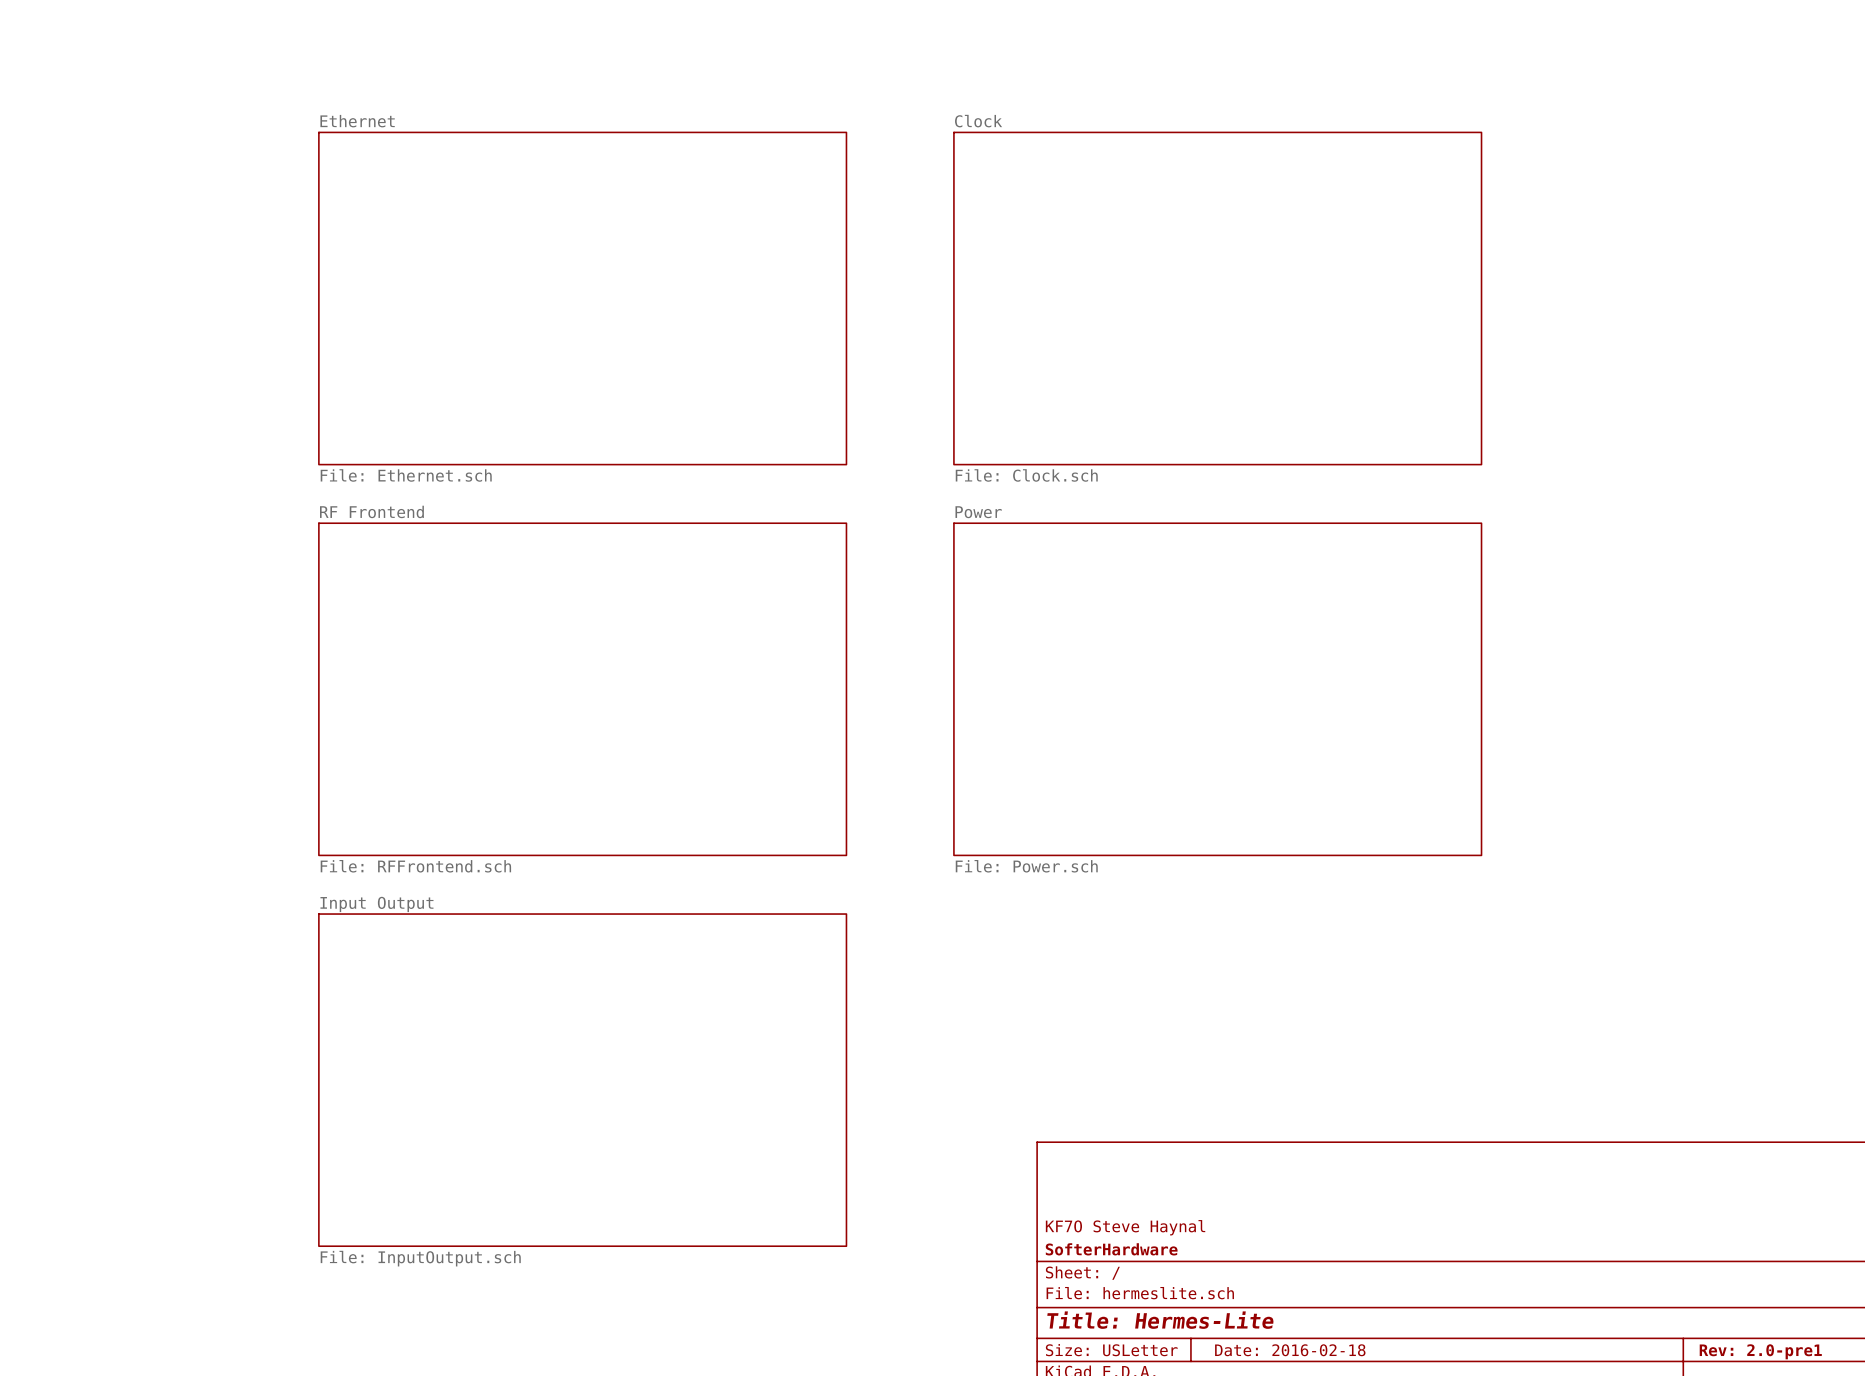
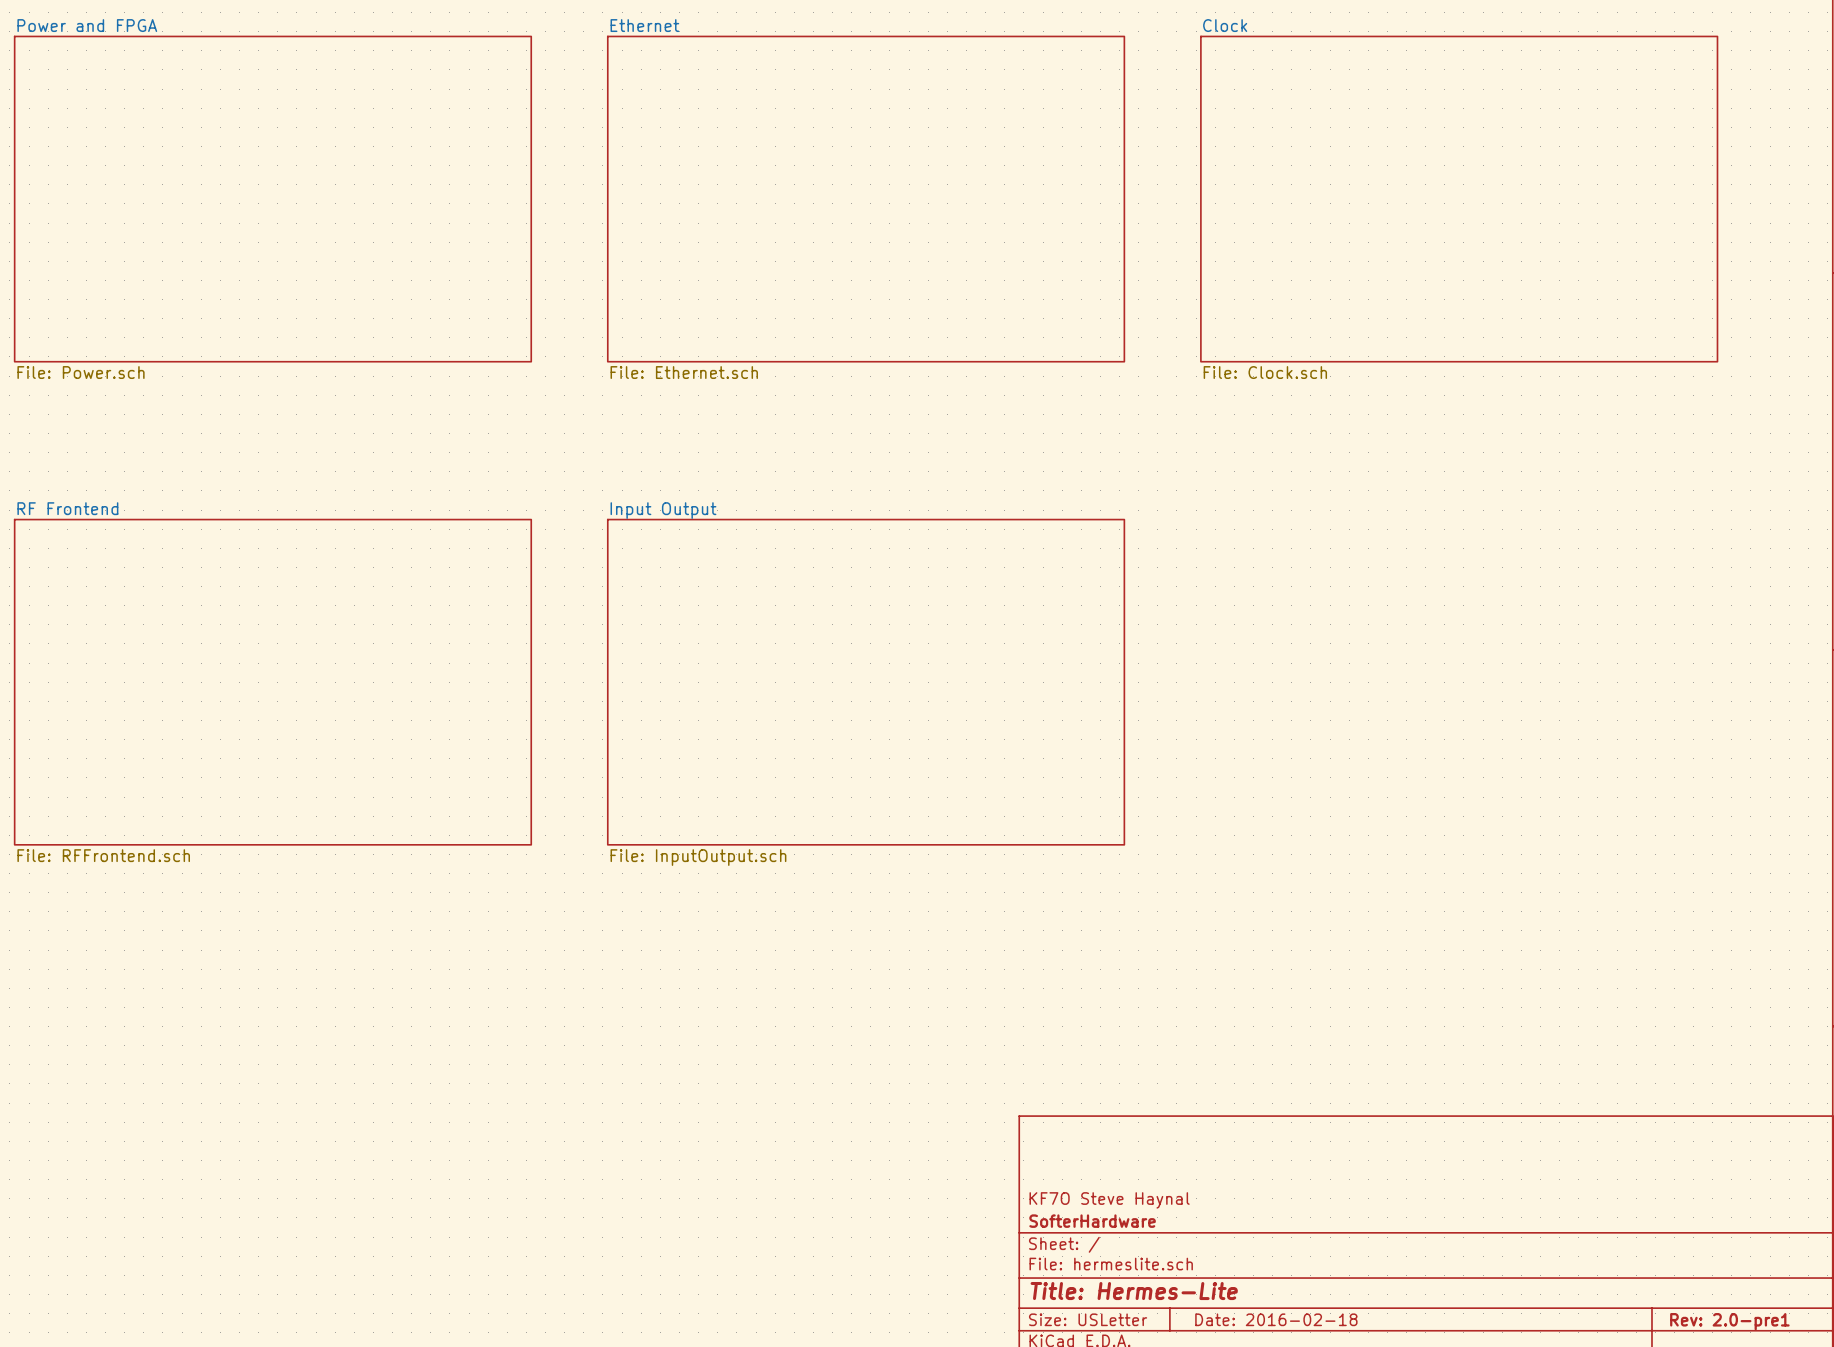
sheet Power and FPGA: none -> File: Power.sch (272, 199)
sheet Ethernet: none -> File: Ethernet.sch (866, 199)
sheet Clock: none -> File: Clock.sch (1459, 199)
sheet Ethernet: File: Ethernet.sch (582, 298) -> none
sheet Clock: File: Clock.sch (1217, 298) -> none
sheet RF Frontend: File: RFFrontend.sch (582, 689) -> none
sheet Power: File: Power.sch (1217, 689) -> none
sheet RF Frontend: none -> File: RFFrontend.sch (272, 682)
sheet Input Output: none -> File: InputOutput.sch (866, 682)
sheet Input Output: File: InputOutput.sch (582, 1080) -> none

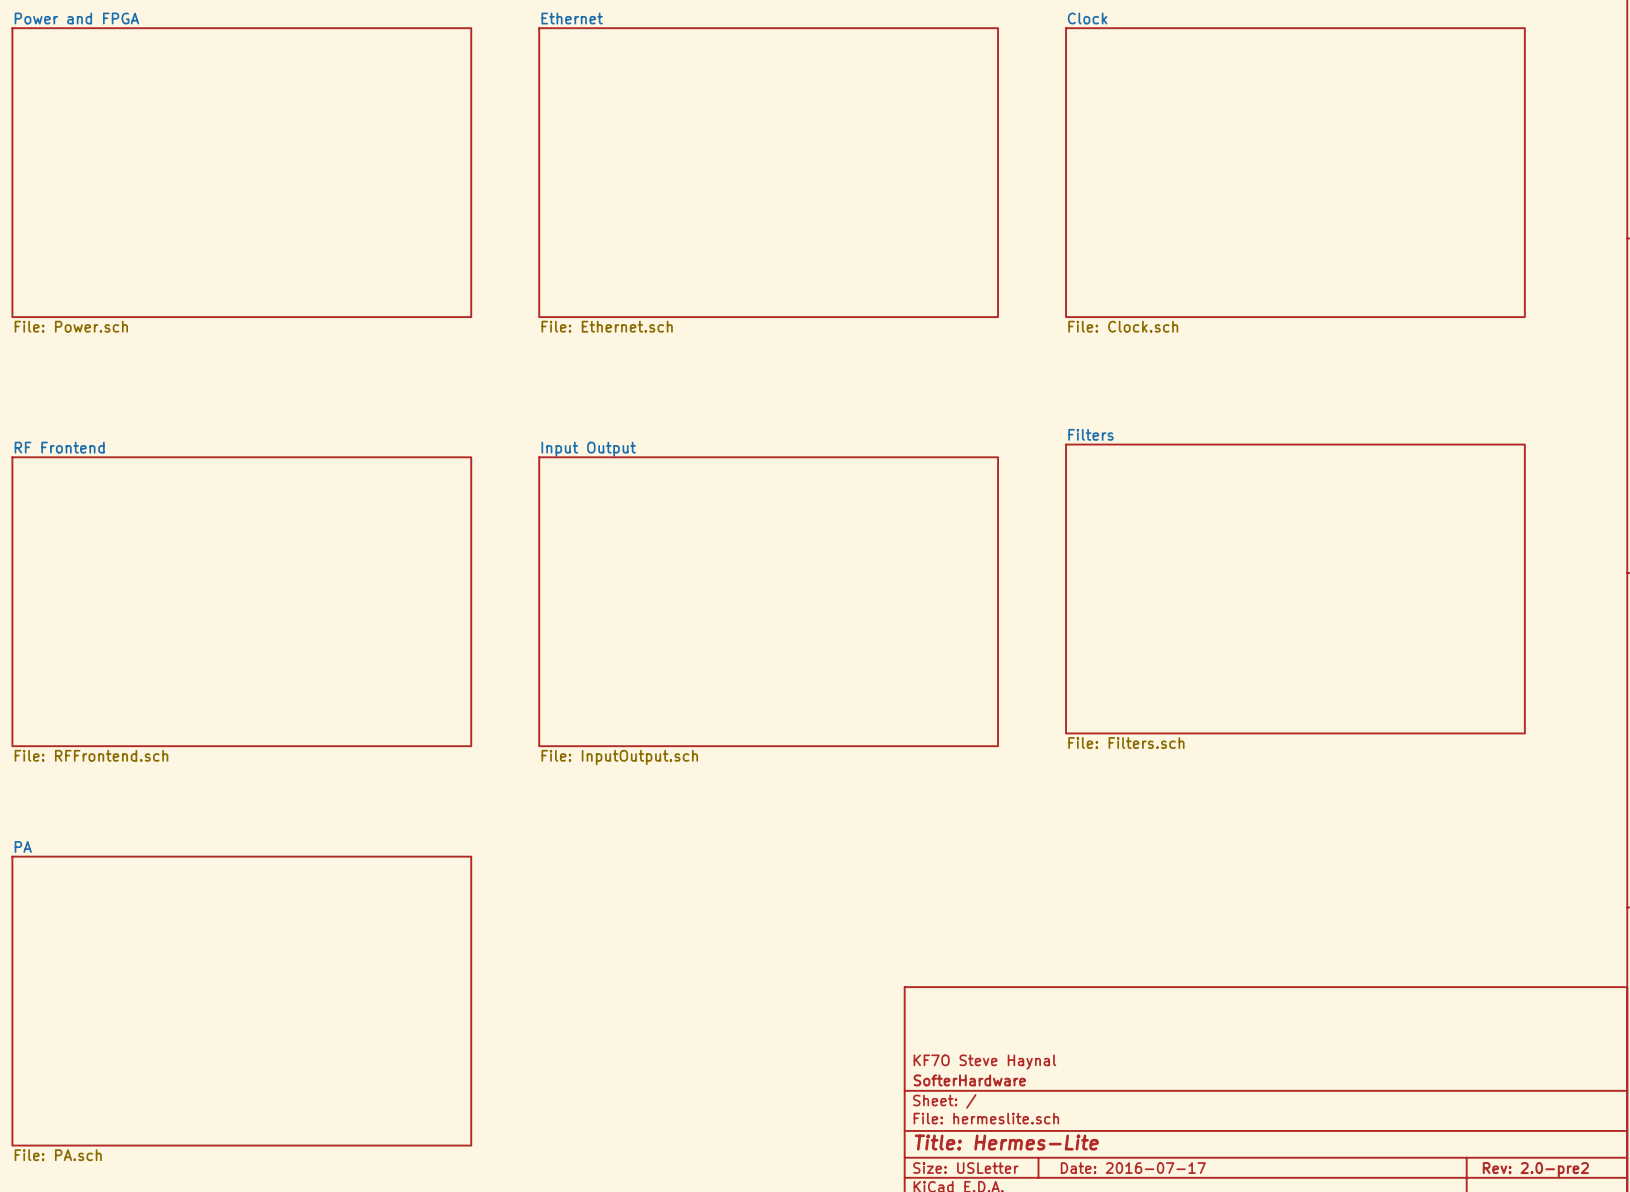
sheet Filters: none -> File: Filters.sch (1295, 589)
sheet PA: none -> File: PA.sch (241, 1001)
title block: Date: 2016-02-18 (1276, 1319) -> Date: 2016-07-17 (1133, 1168)
title block: Rev: 2.0-pre1 (1729, 1321) -> Rev: 2.0-pre2 (1535, 1169)

